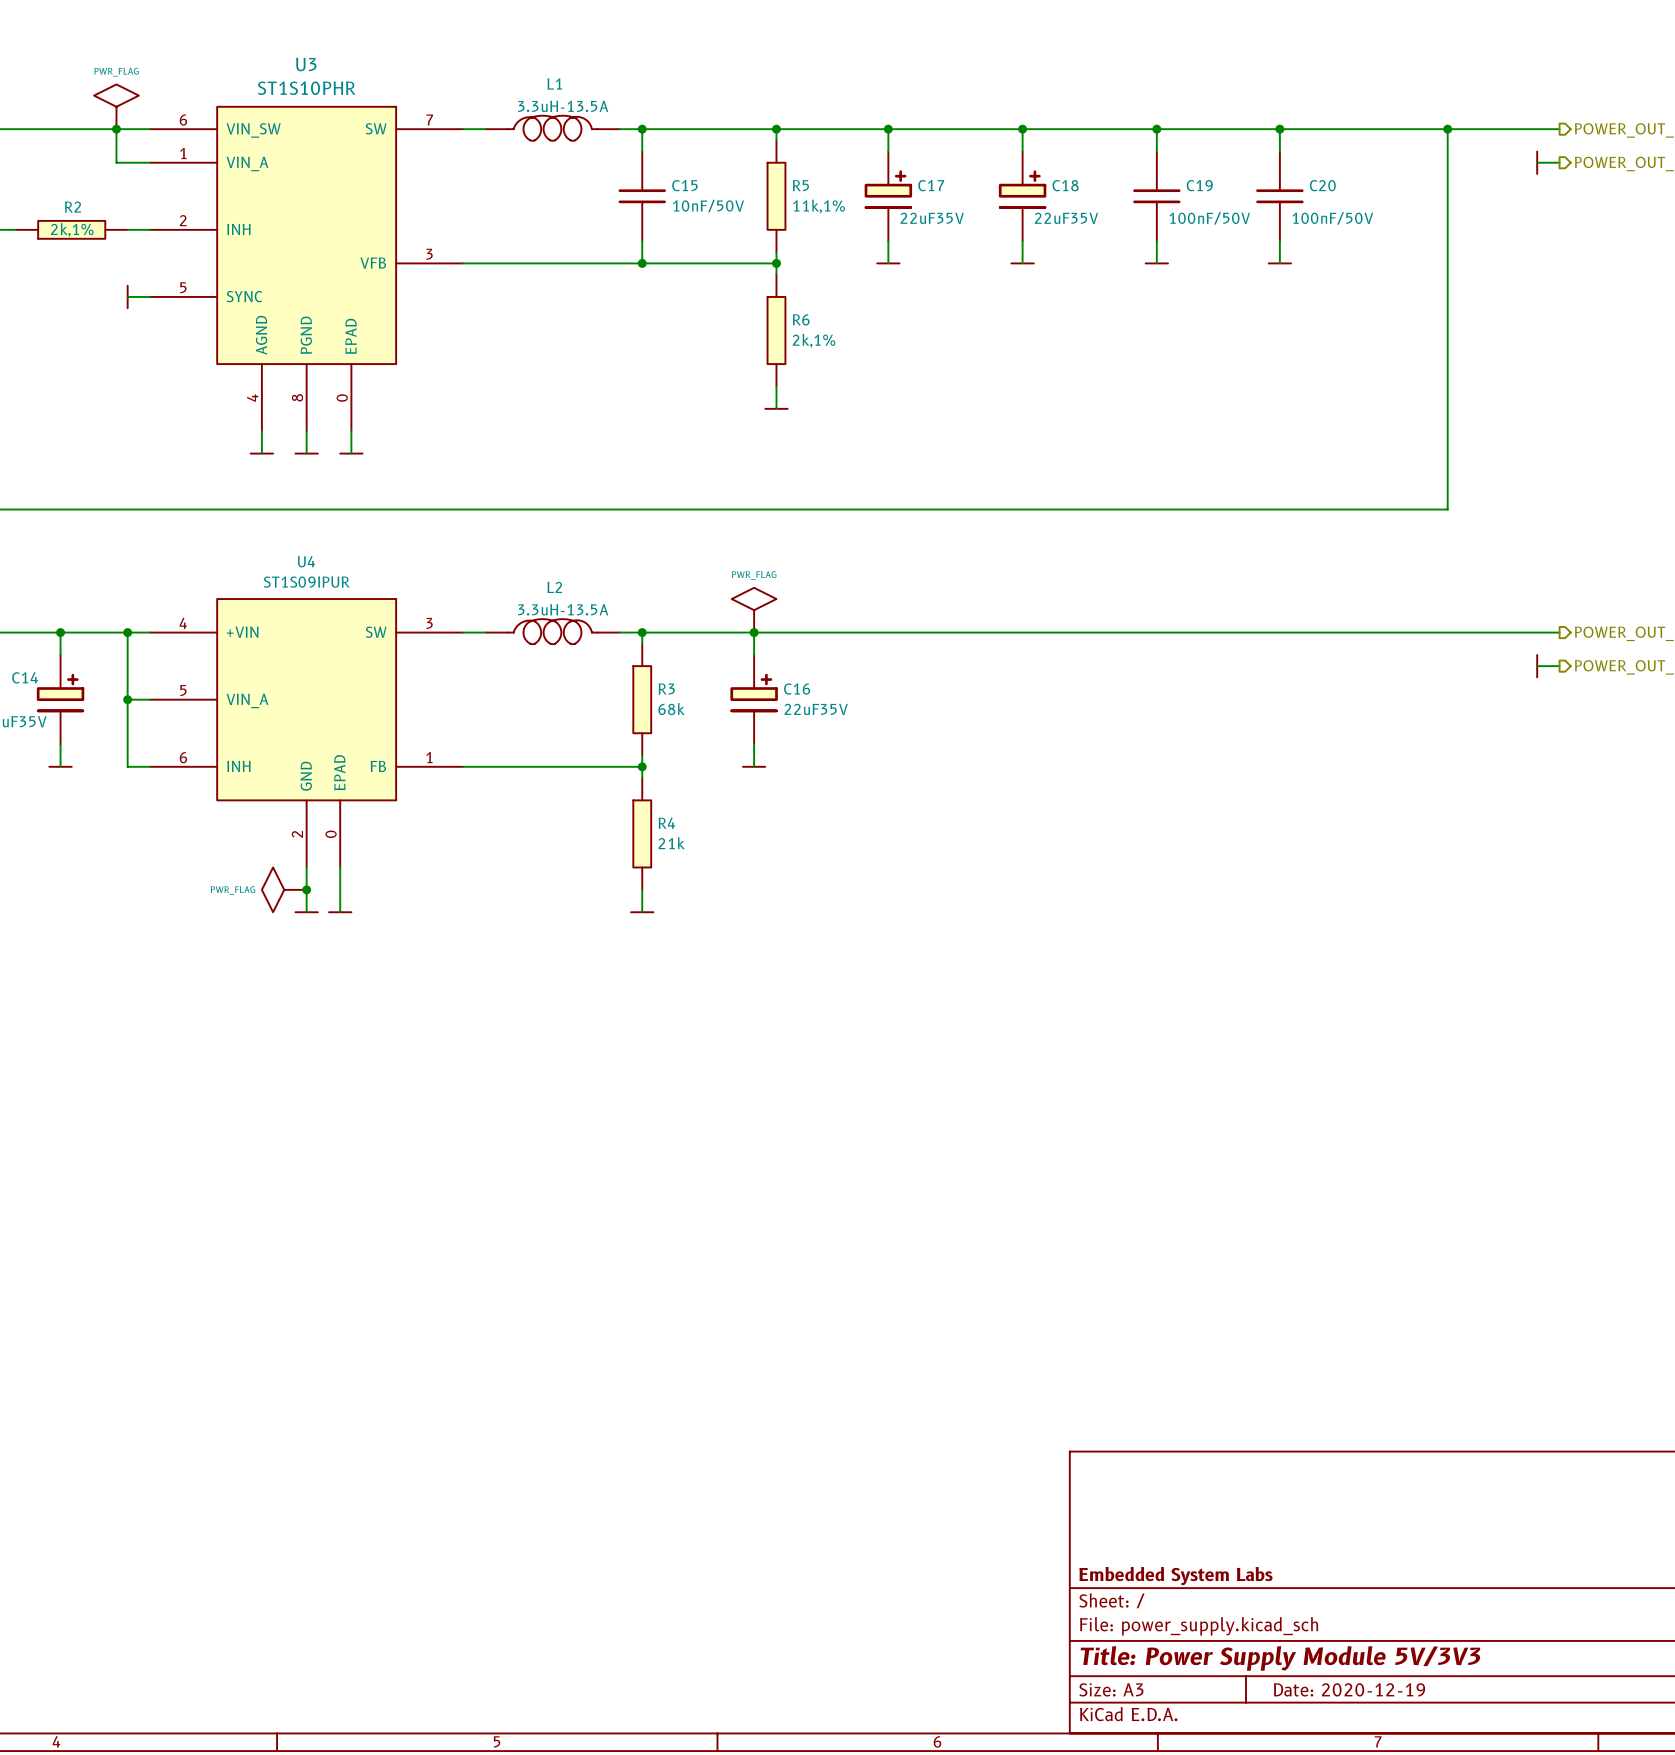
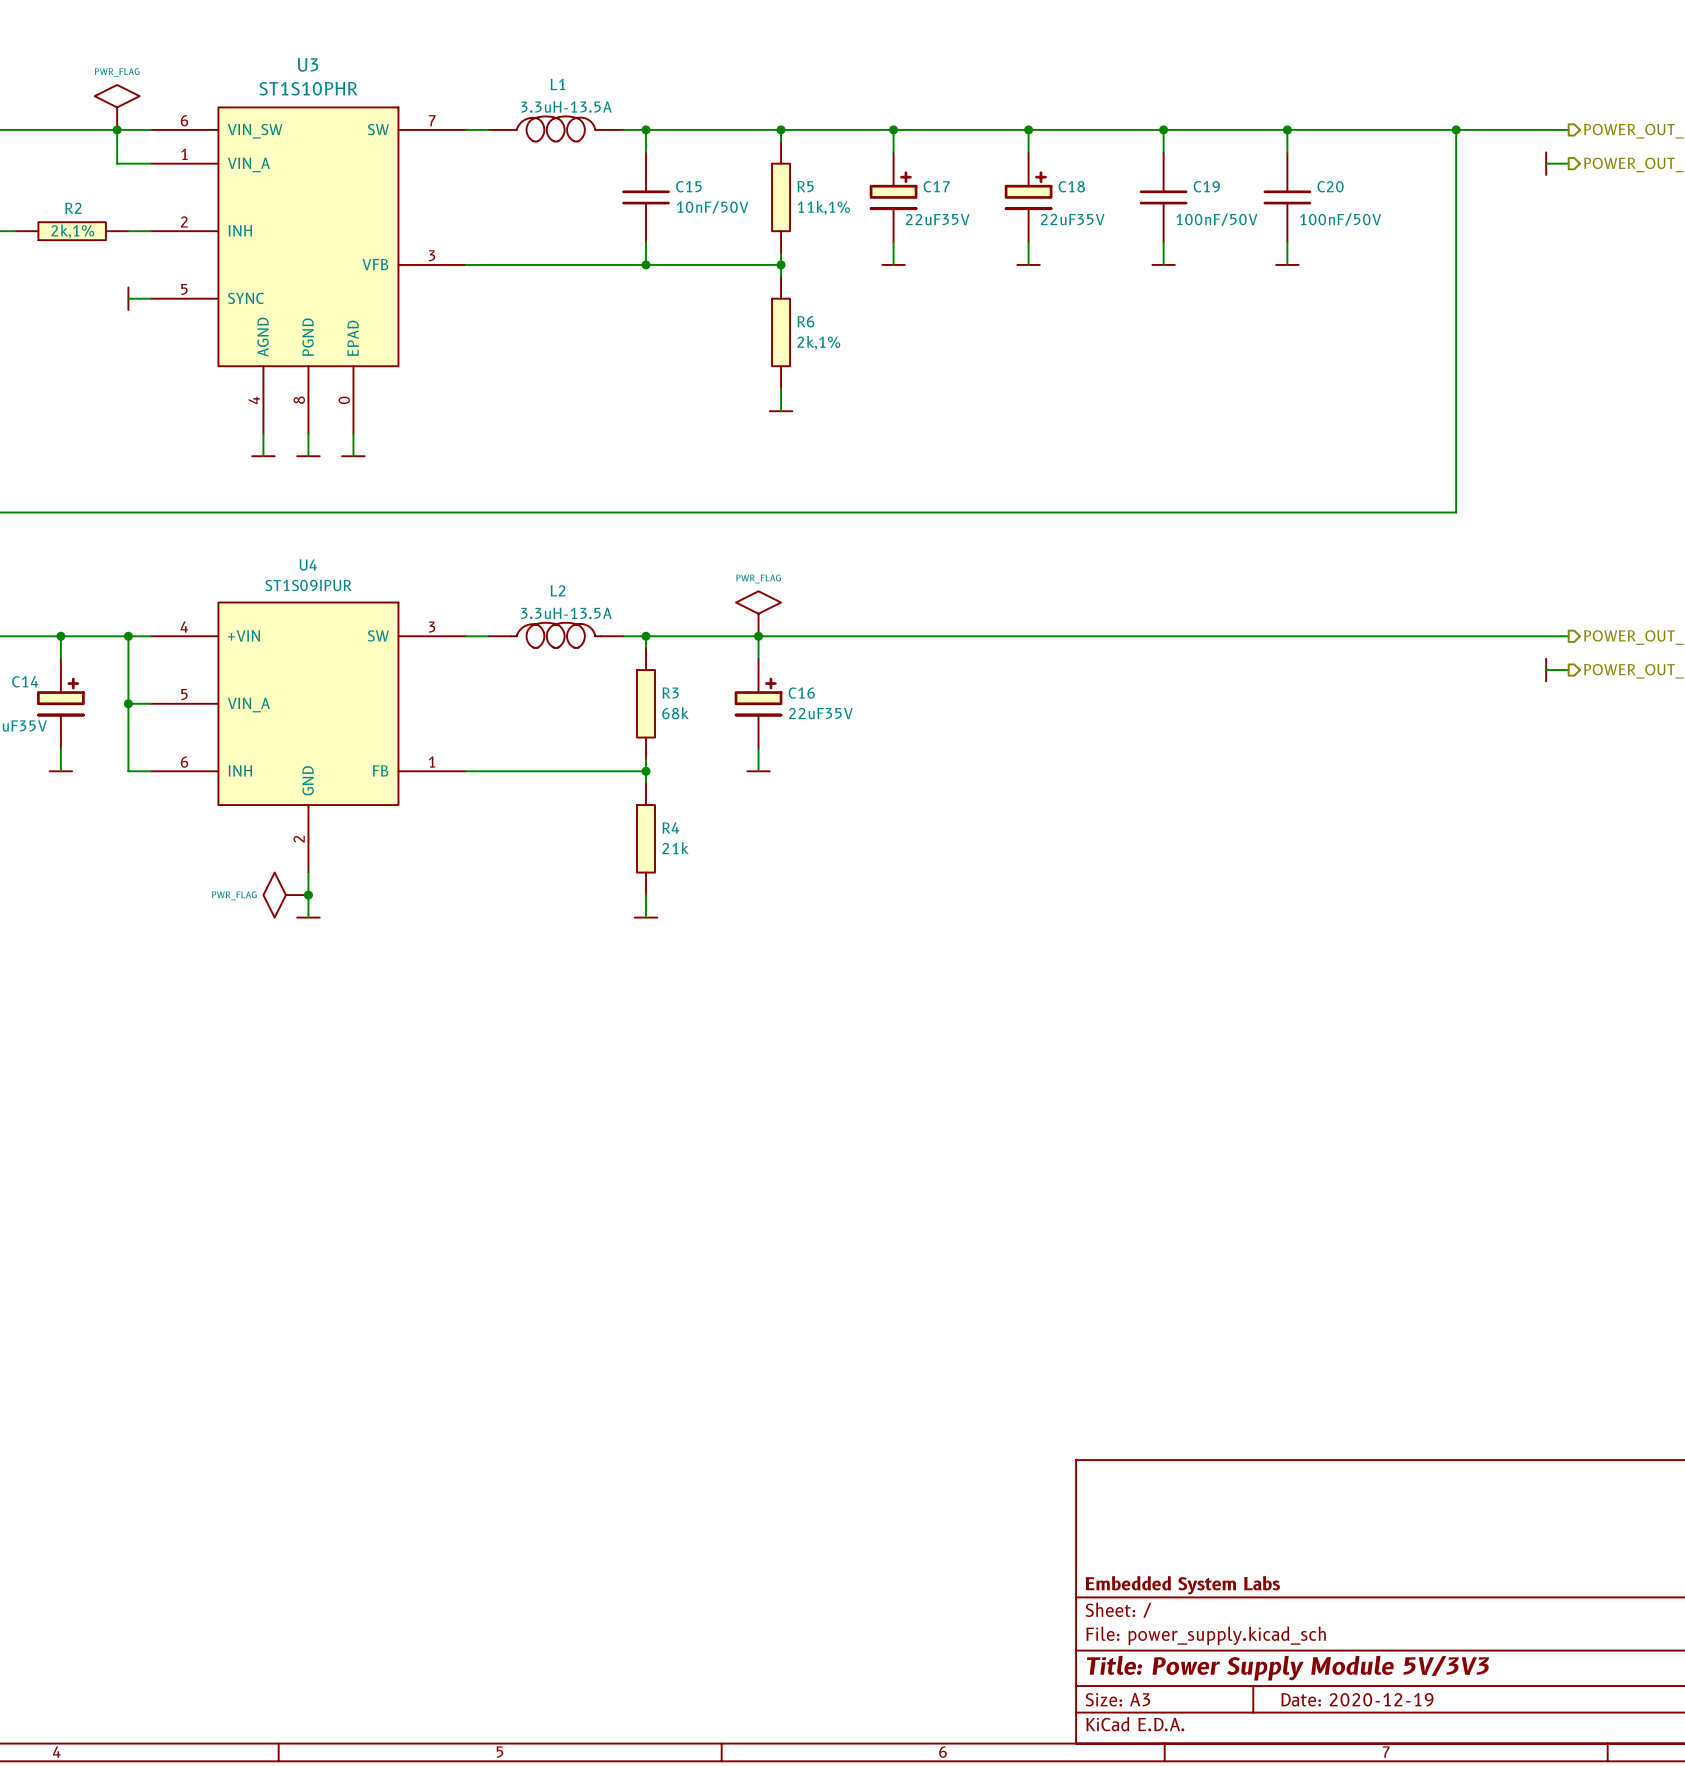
U4 symbol: [150, 599, 464, 868] -> [150, 602, 466, 873]
wire: (340, 867) (340, 912) -> none
power symbol: (340, 912) -> none

